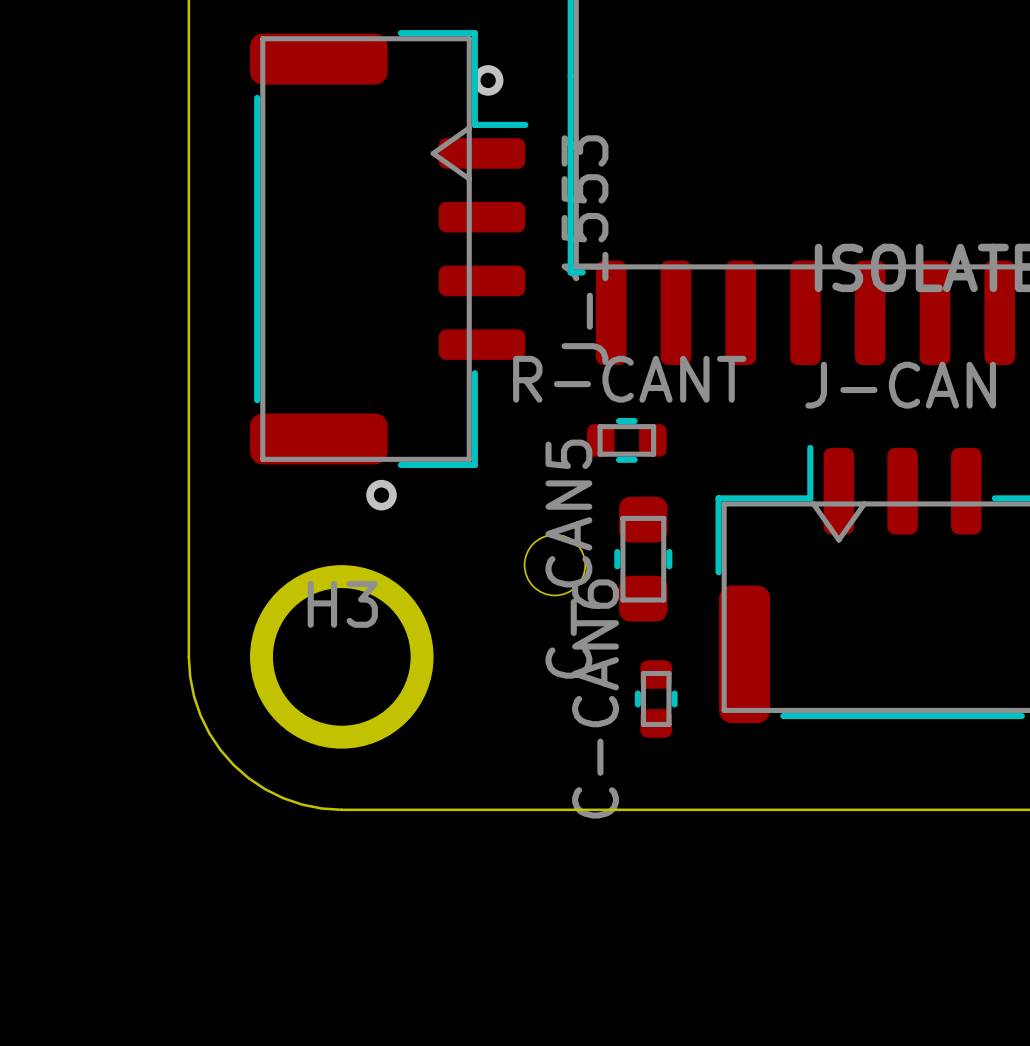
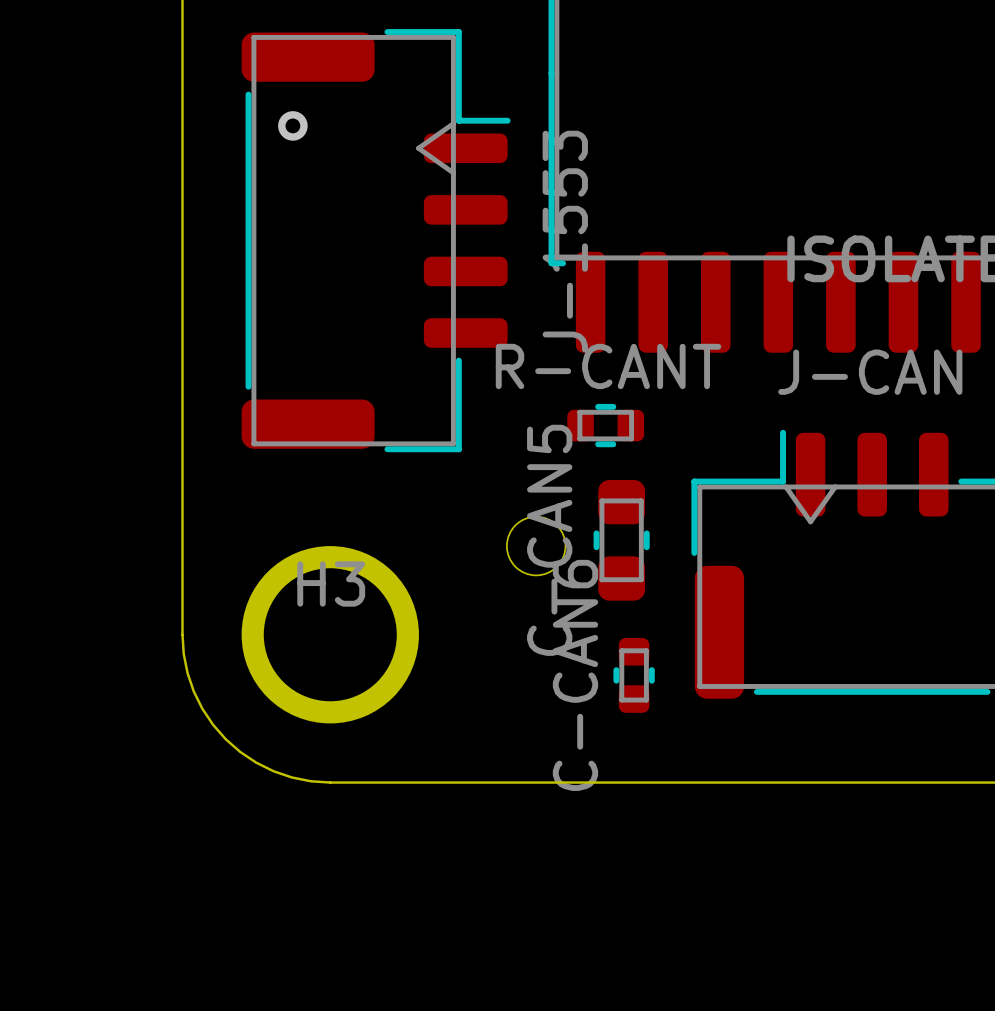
via: (488, 80) -> none
via: none -> (292, 125)
via: (381, 495) -> none

